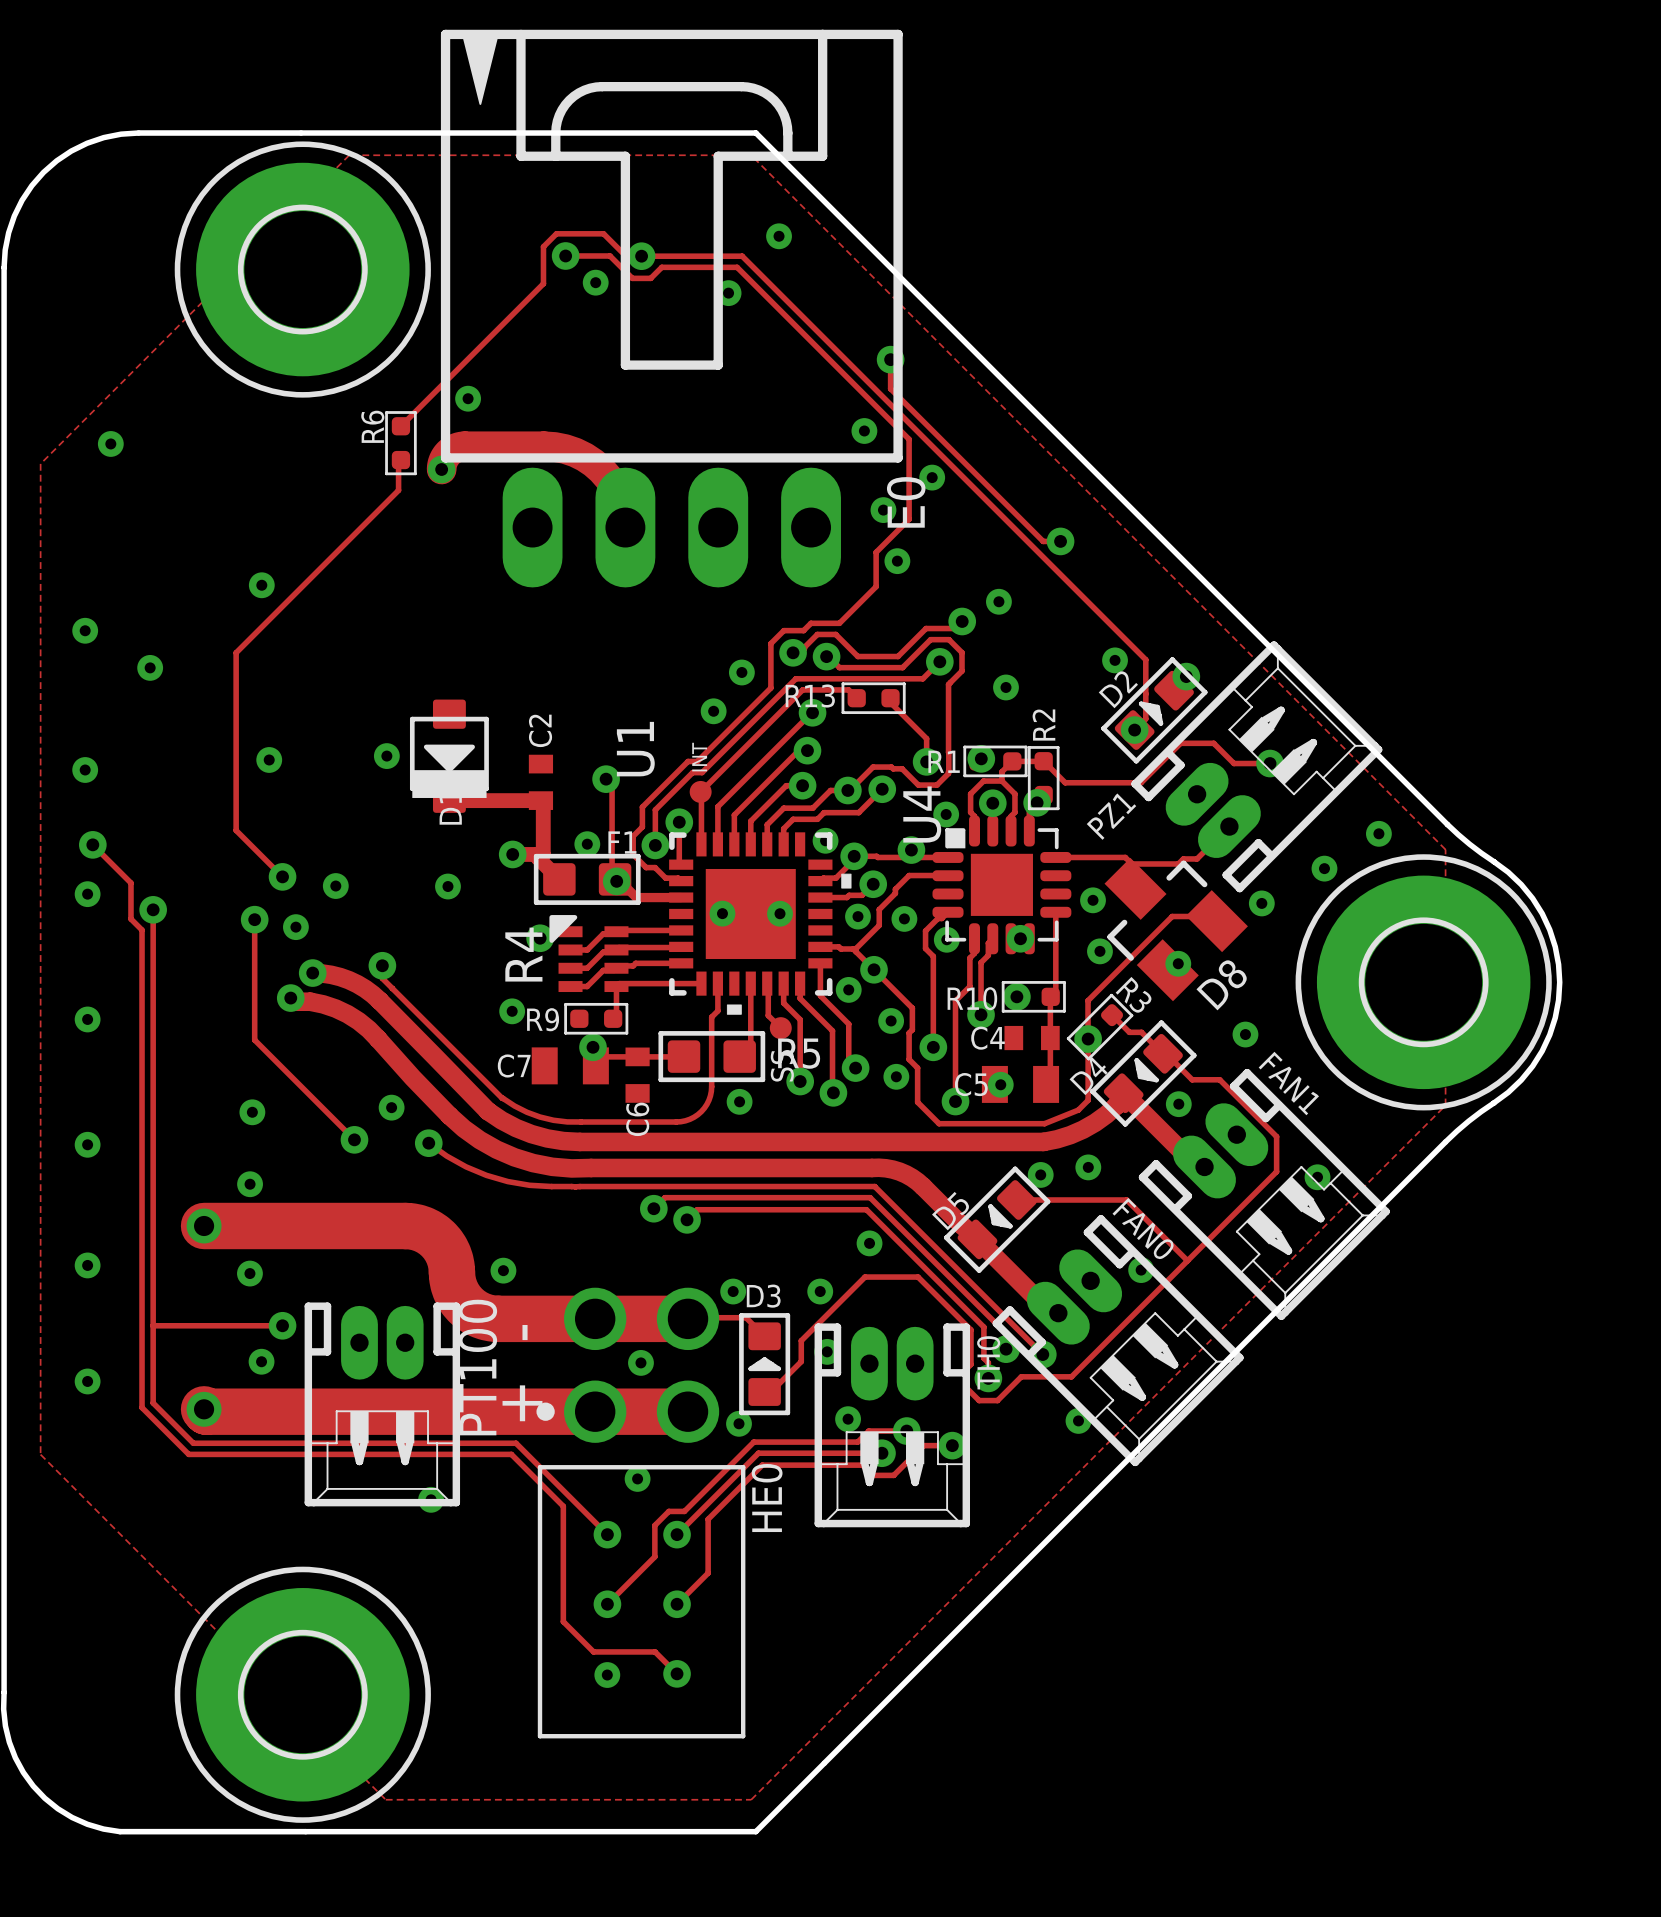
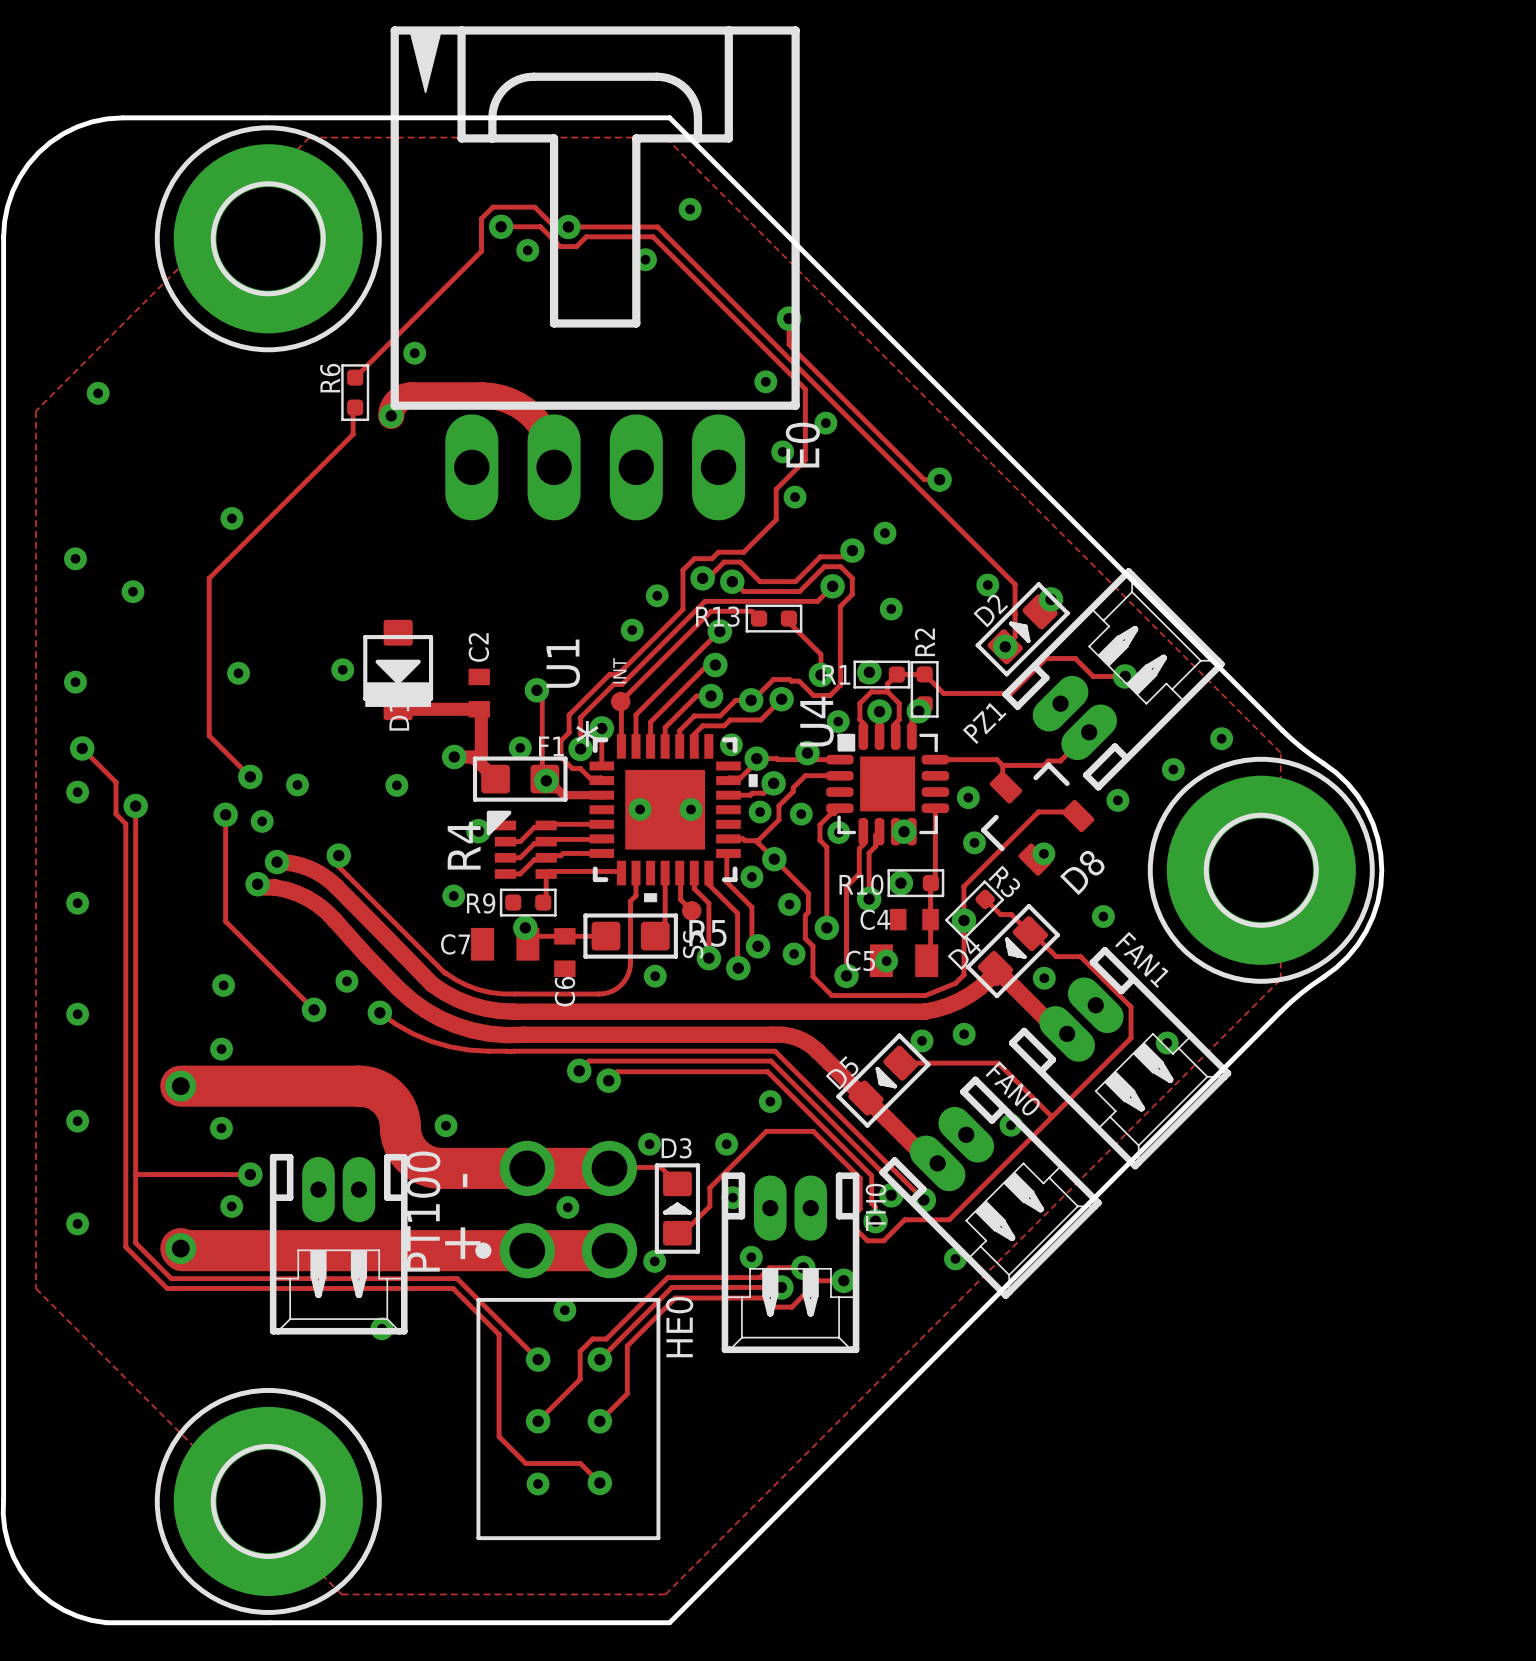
U1 footprint: [669, 832, 852, 1015] -> [589, 734, 758, 903]
D8 footprint: [1104, 857, 1248, 1002] -> [981, 762, 1095, 876]

